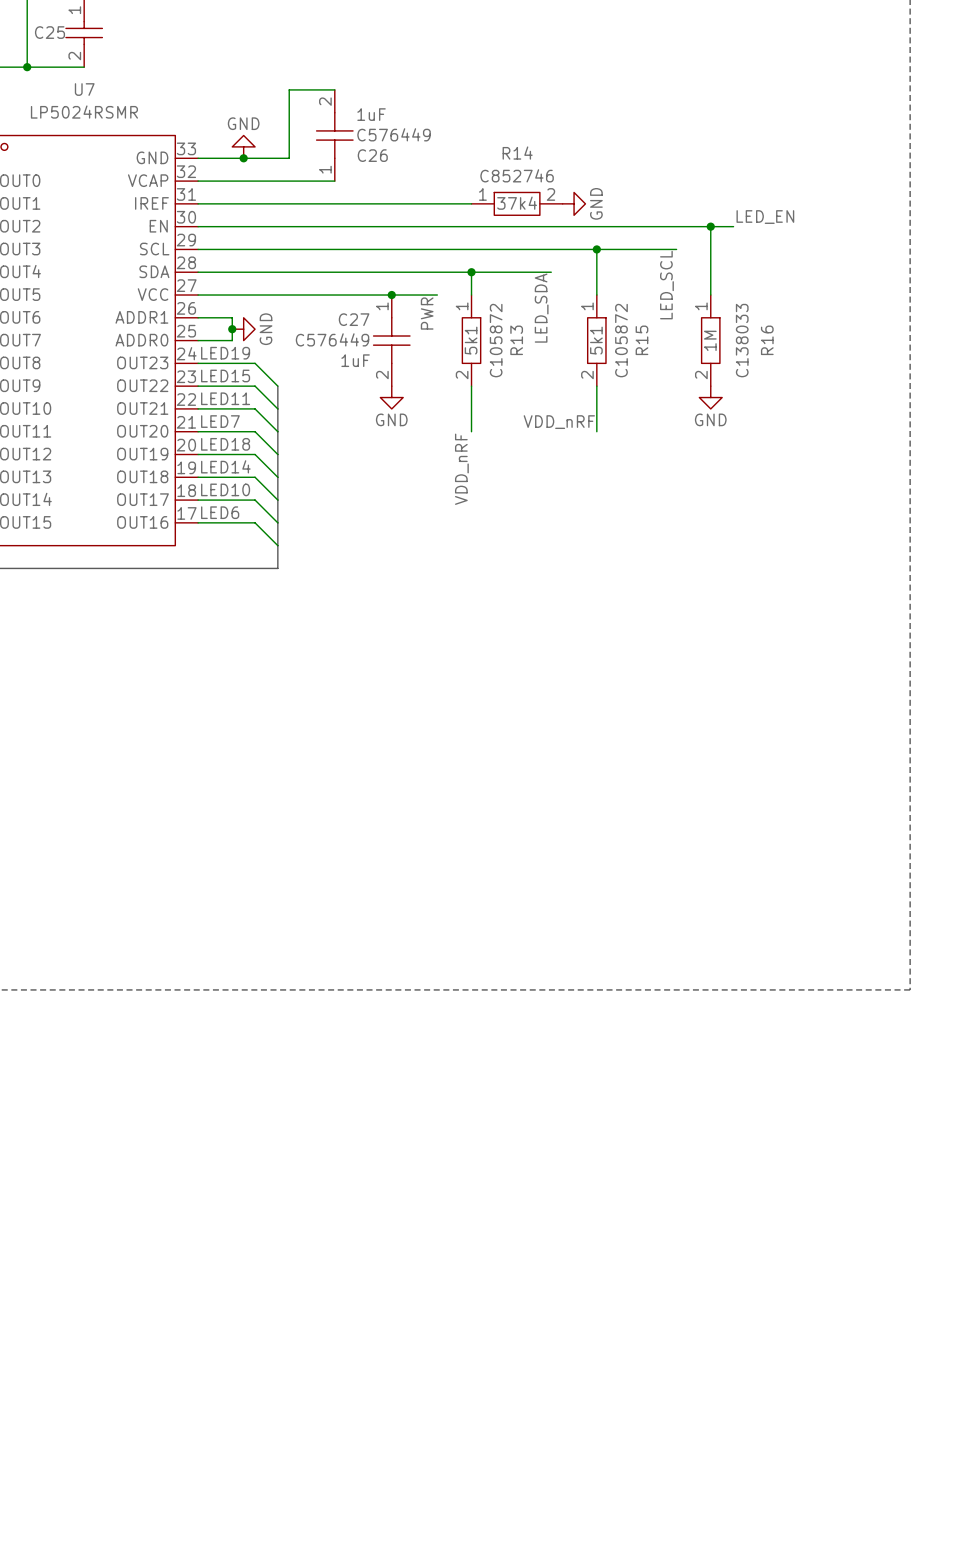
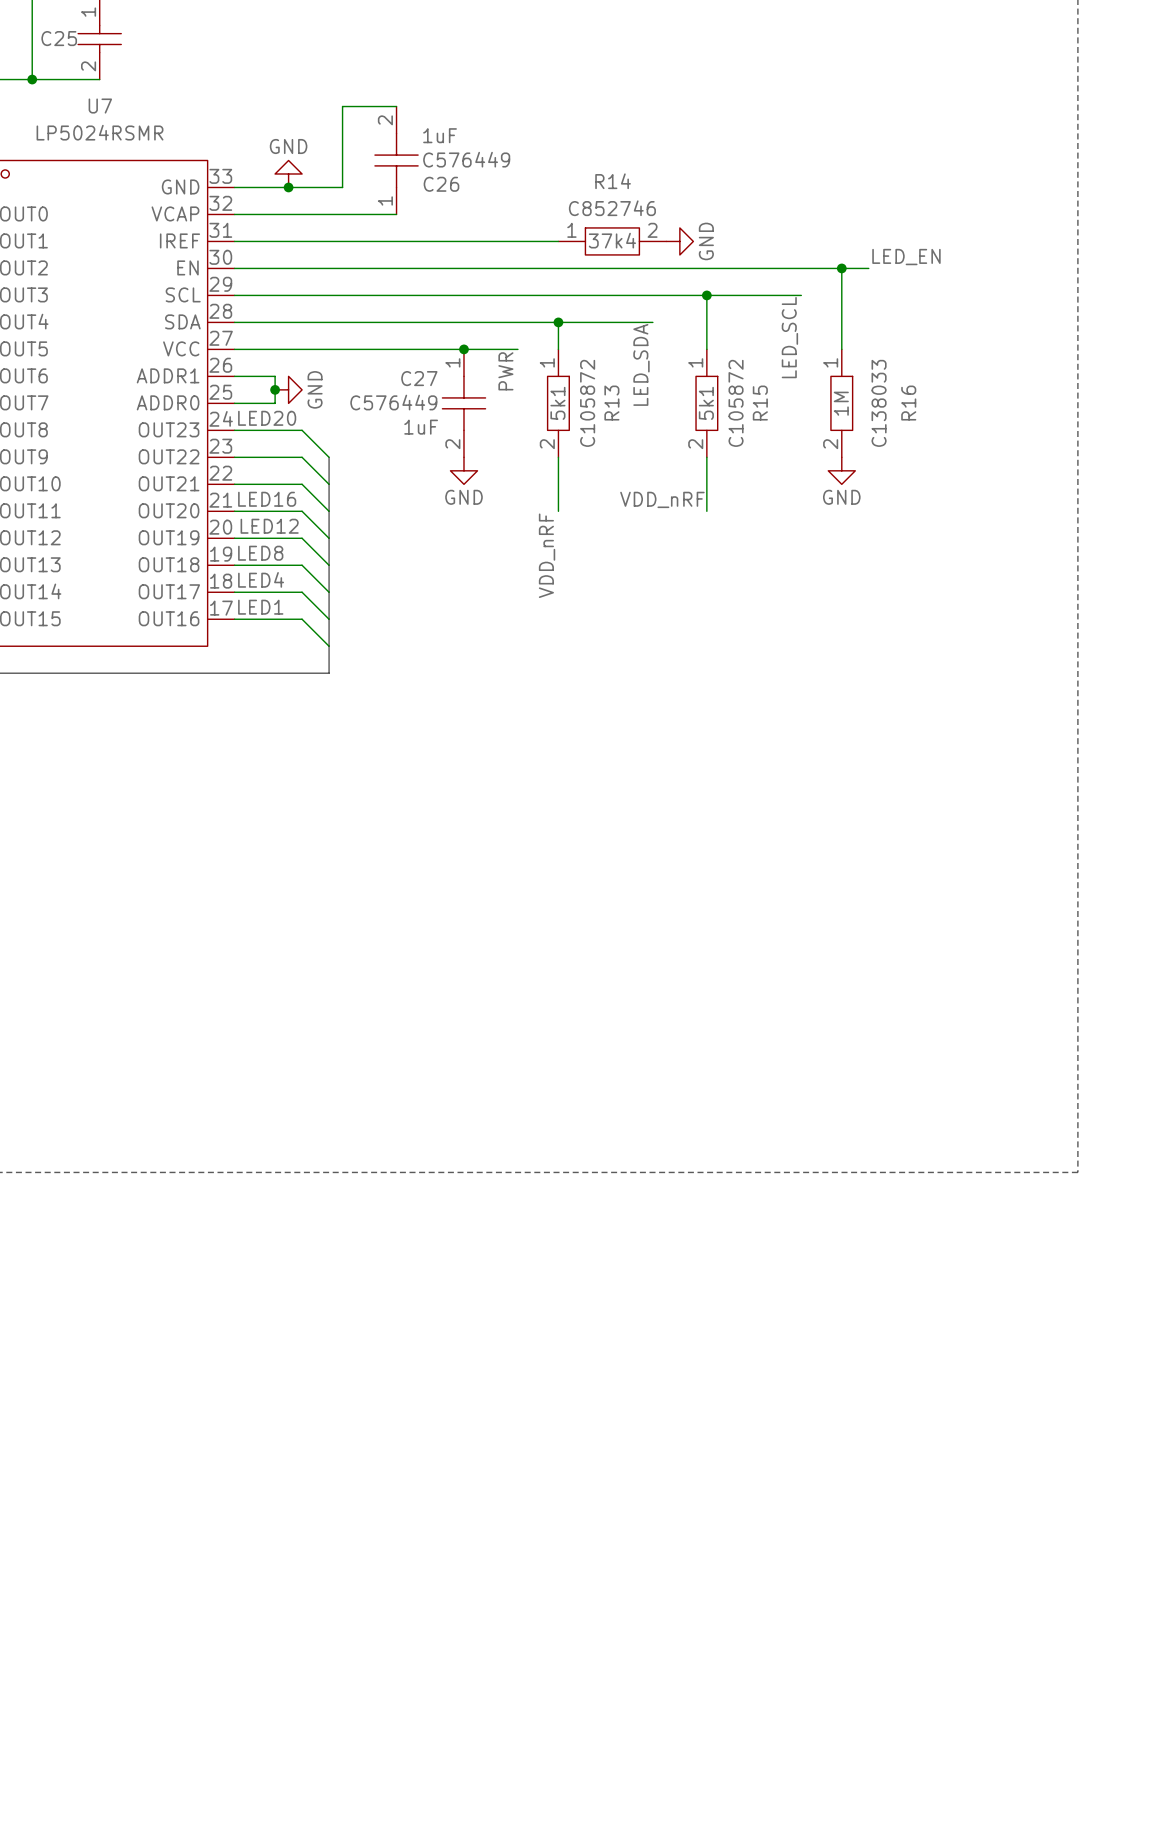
label: LED19 (225, 353) -> LED20 (267, 418)
label: LED15 (225, 375) -> none
label: LED11 (225, 398) -> none
label: LED7 (220, 421) -> LED16 (267, 499)
label: LED18 (225, 444) -> LED12 (269, 526)
label: LED14 (225, 466) -> LED8 (260, 553)
label: LED10 (225, 489) -> LED4 (261, 579)
label: LED6 (220, 512) -> LED1 (260, 607)

